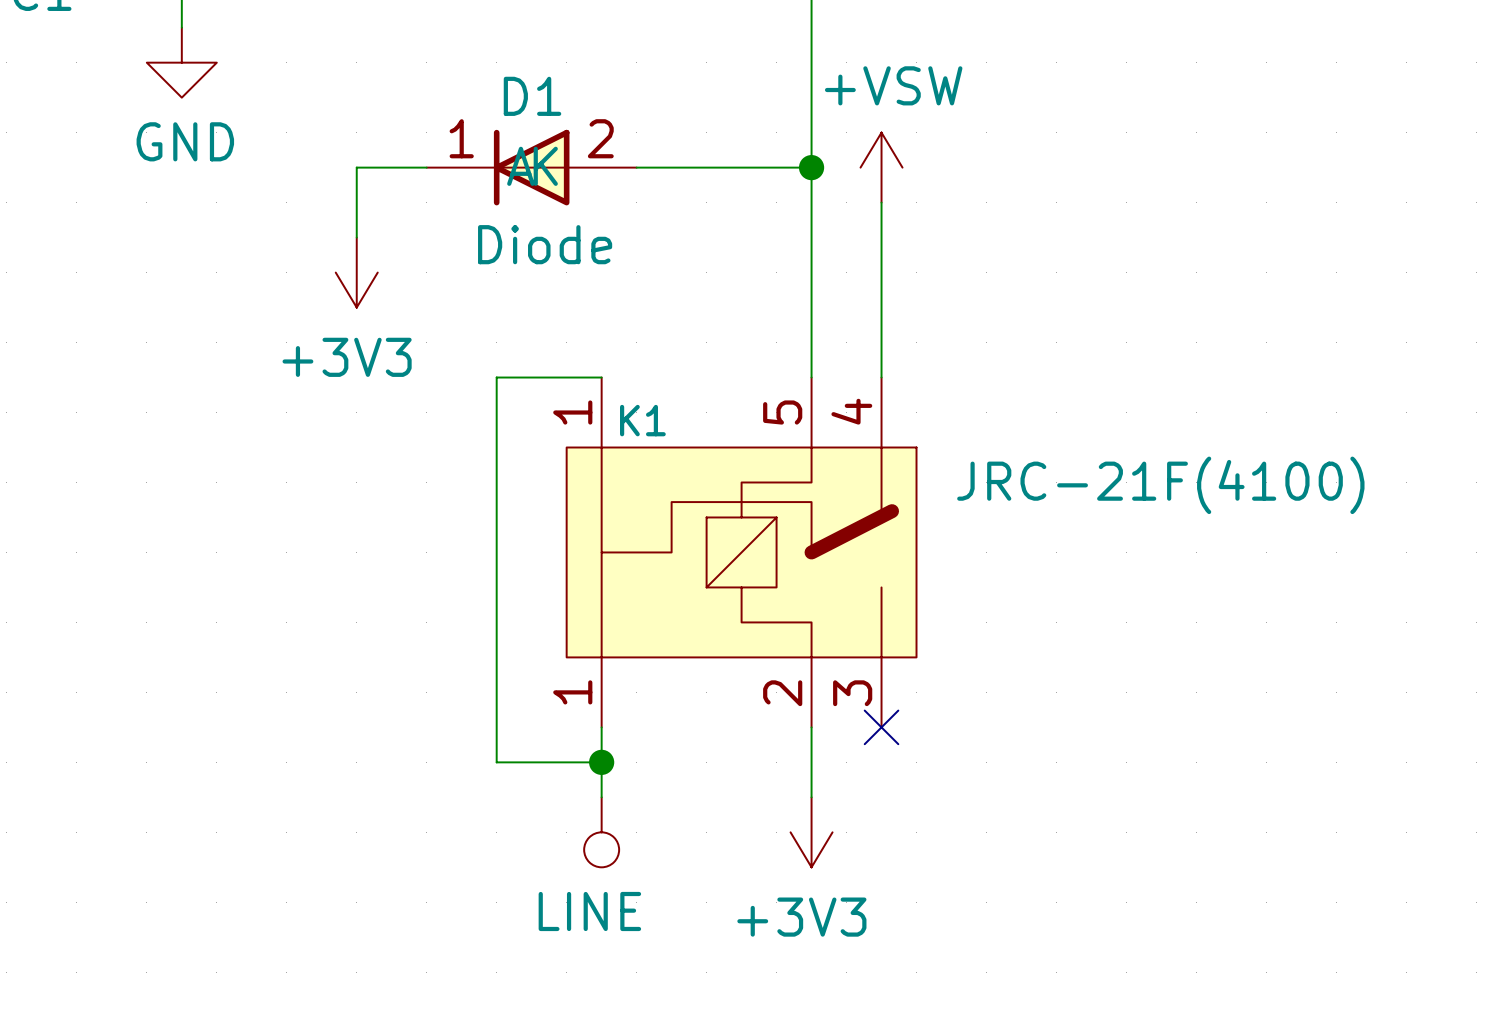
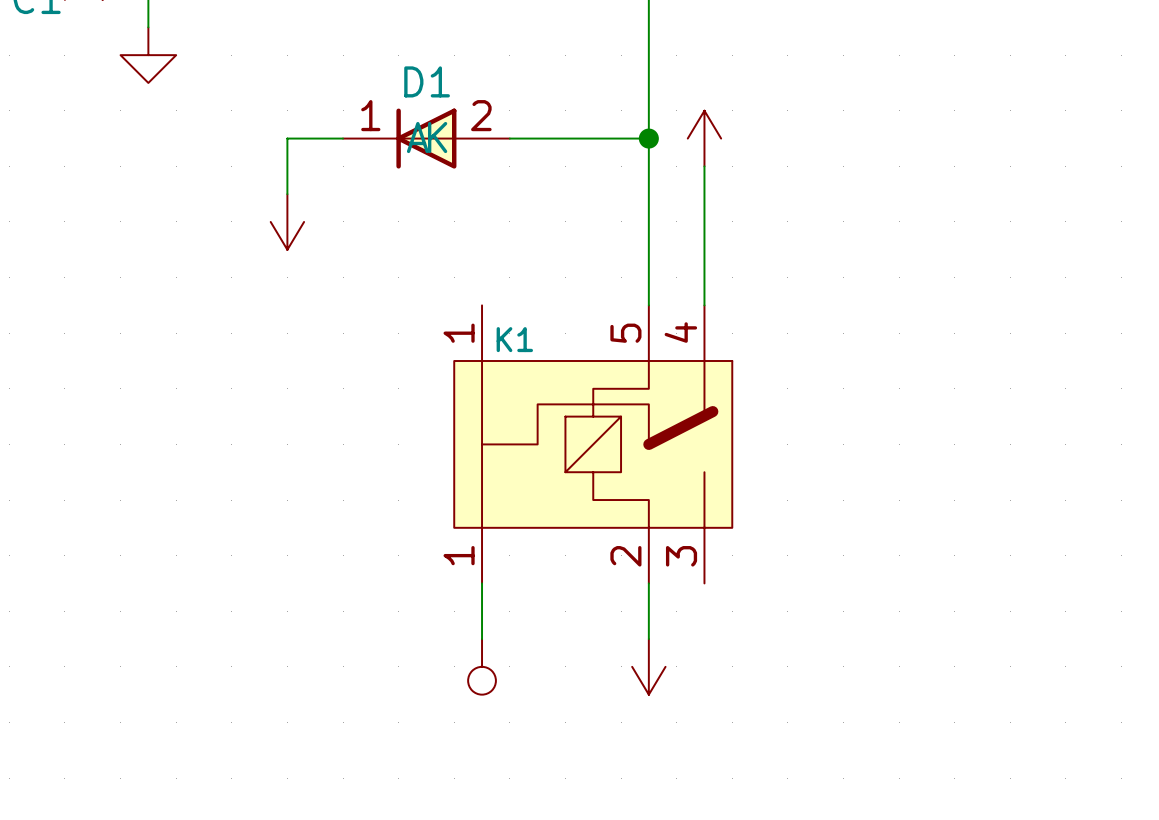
power symbol text: +VSW (893, 85) -> none
power symbol text: GND (185, 141) -> none
D1 value: Diode (545, 244) -> none
power symbol text: +3V3 (347, 357) -> none
wire: (601, 377) (496, 377) (496, 762) (601, 762) -> none
K1 value: JRC-21F(4100) (1160, 485) -> none
no-connect mark: (881, 727) -> none
junction: (601, 762) -> none
power symbol text: LINE (589, 911) -> none
power symbol text: +3V3 (801, 917) -> none

